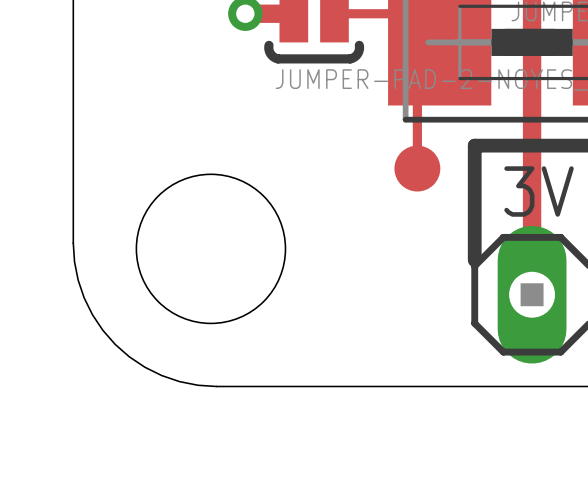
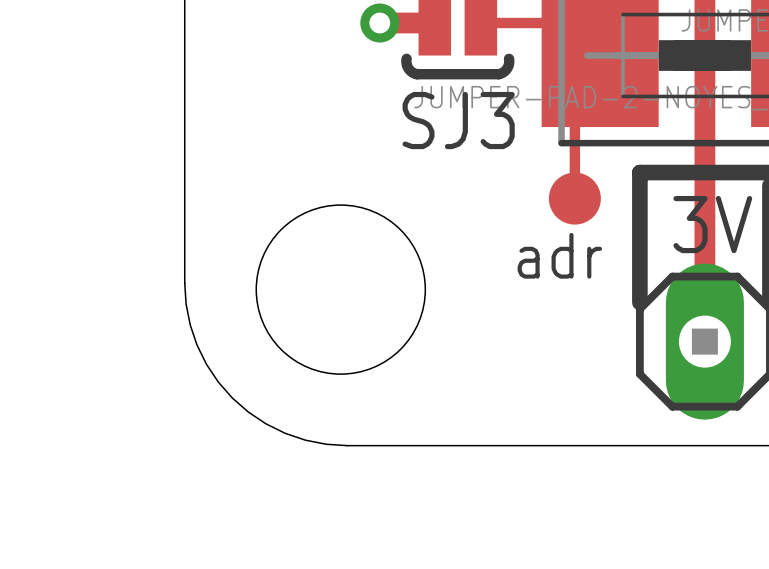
text: none -> SJ3 (458, 120)
text: none -> adr (559, 255)

